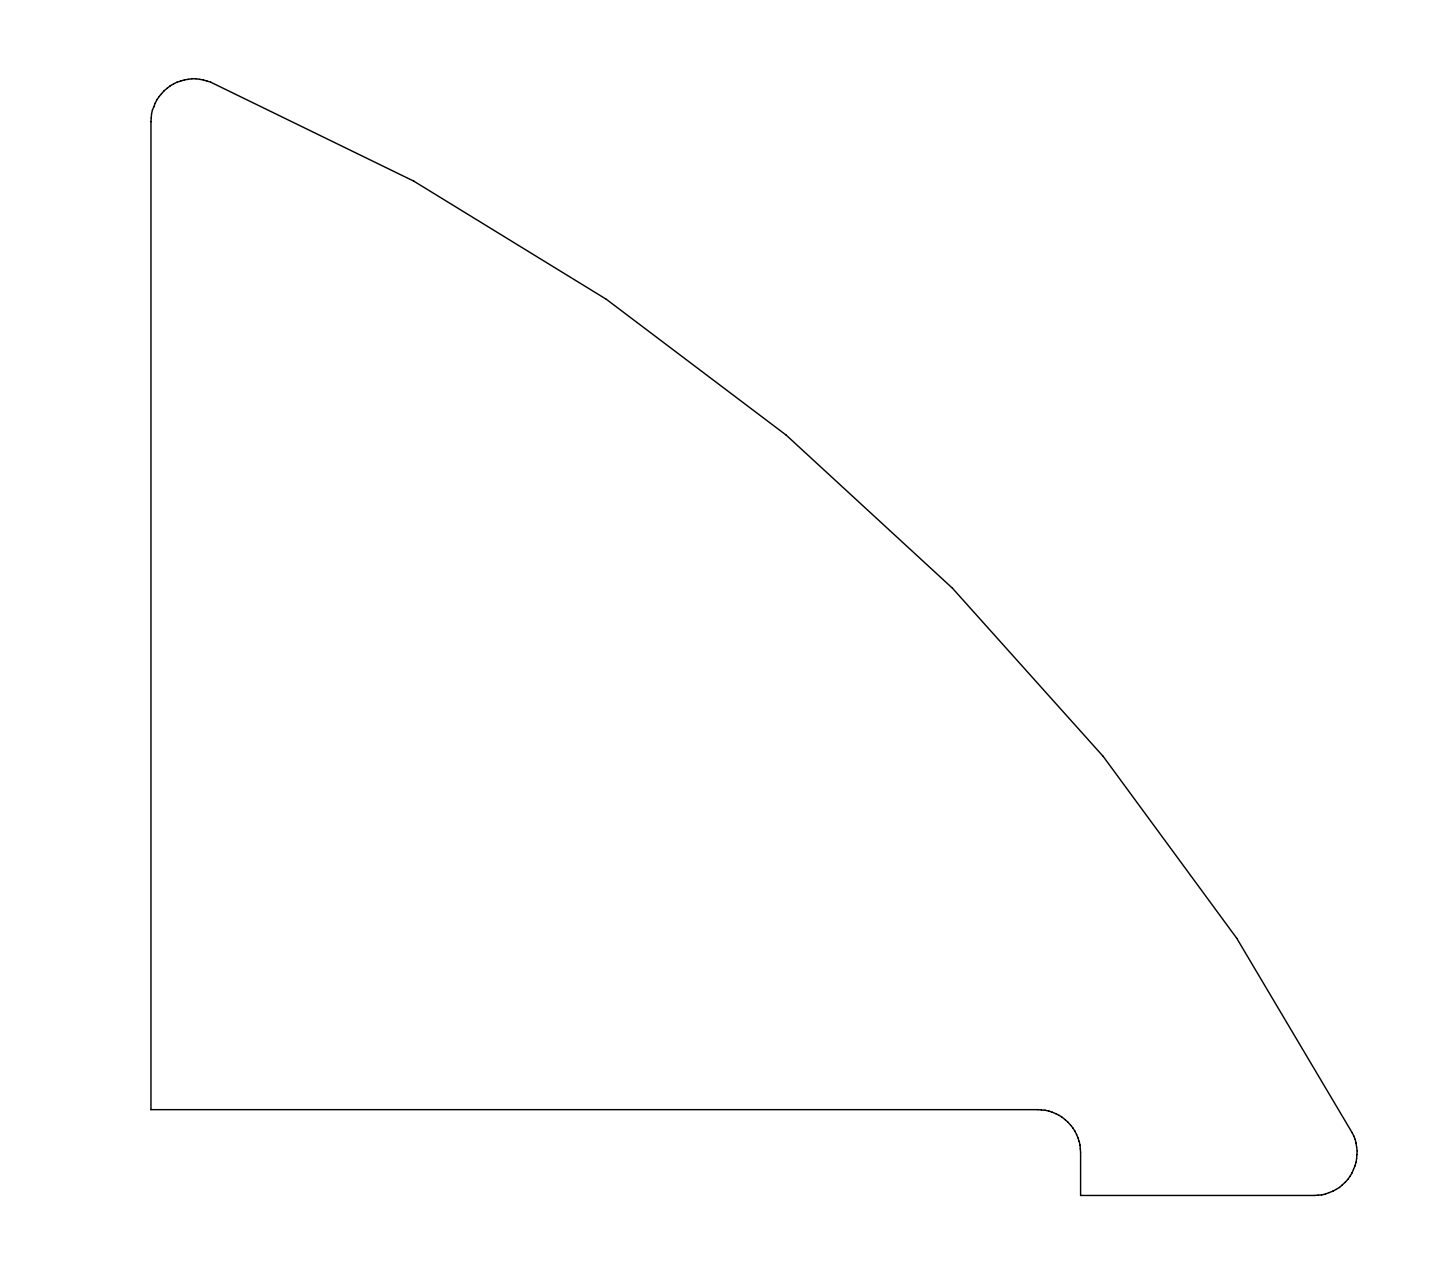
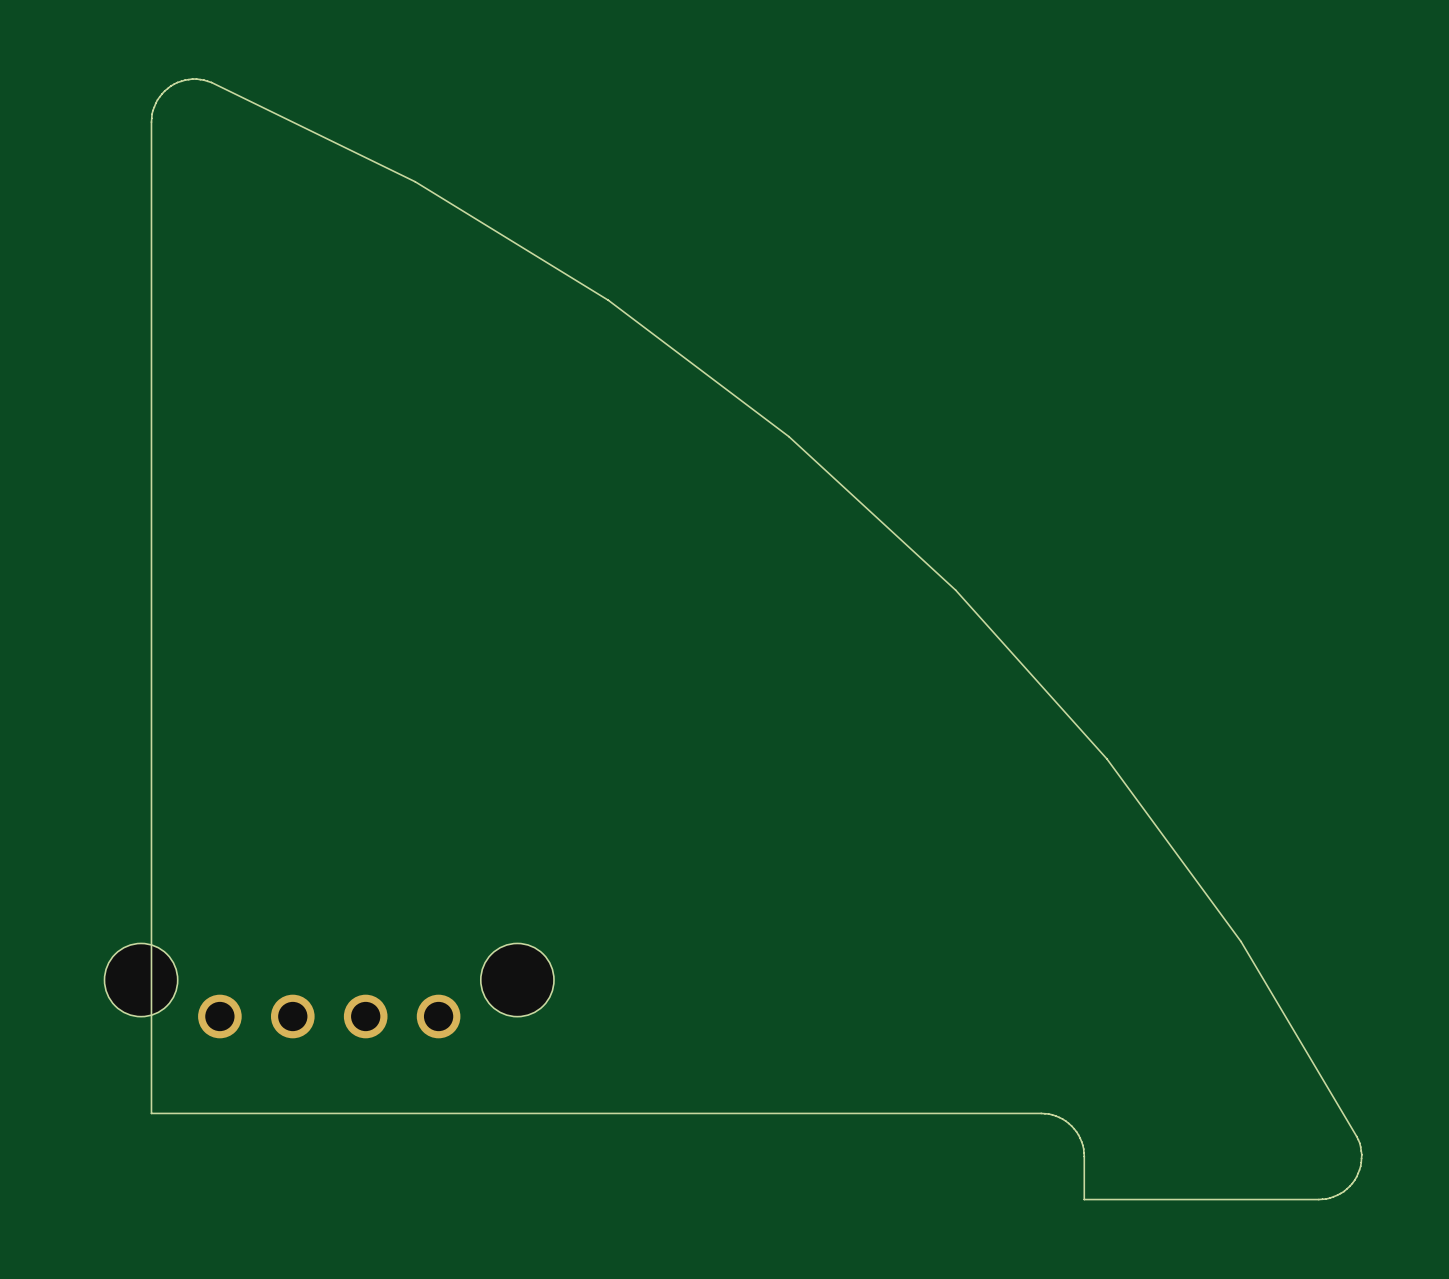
part: none -> (329, 990)

